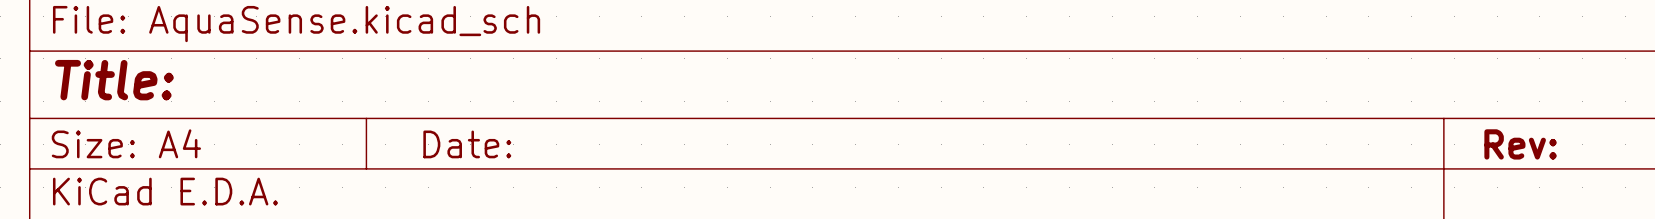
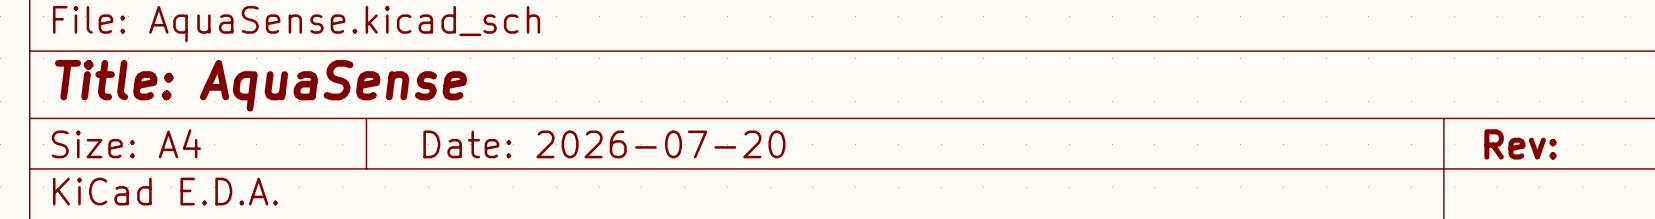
title block: Title: (114, 80) -> Title: AquaSense (261, 85)
title block: Date: (467, 144) -> Date: 2026-07-20 (604, 144)

